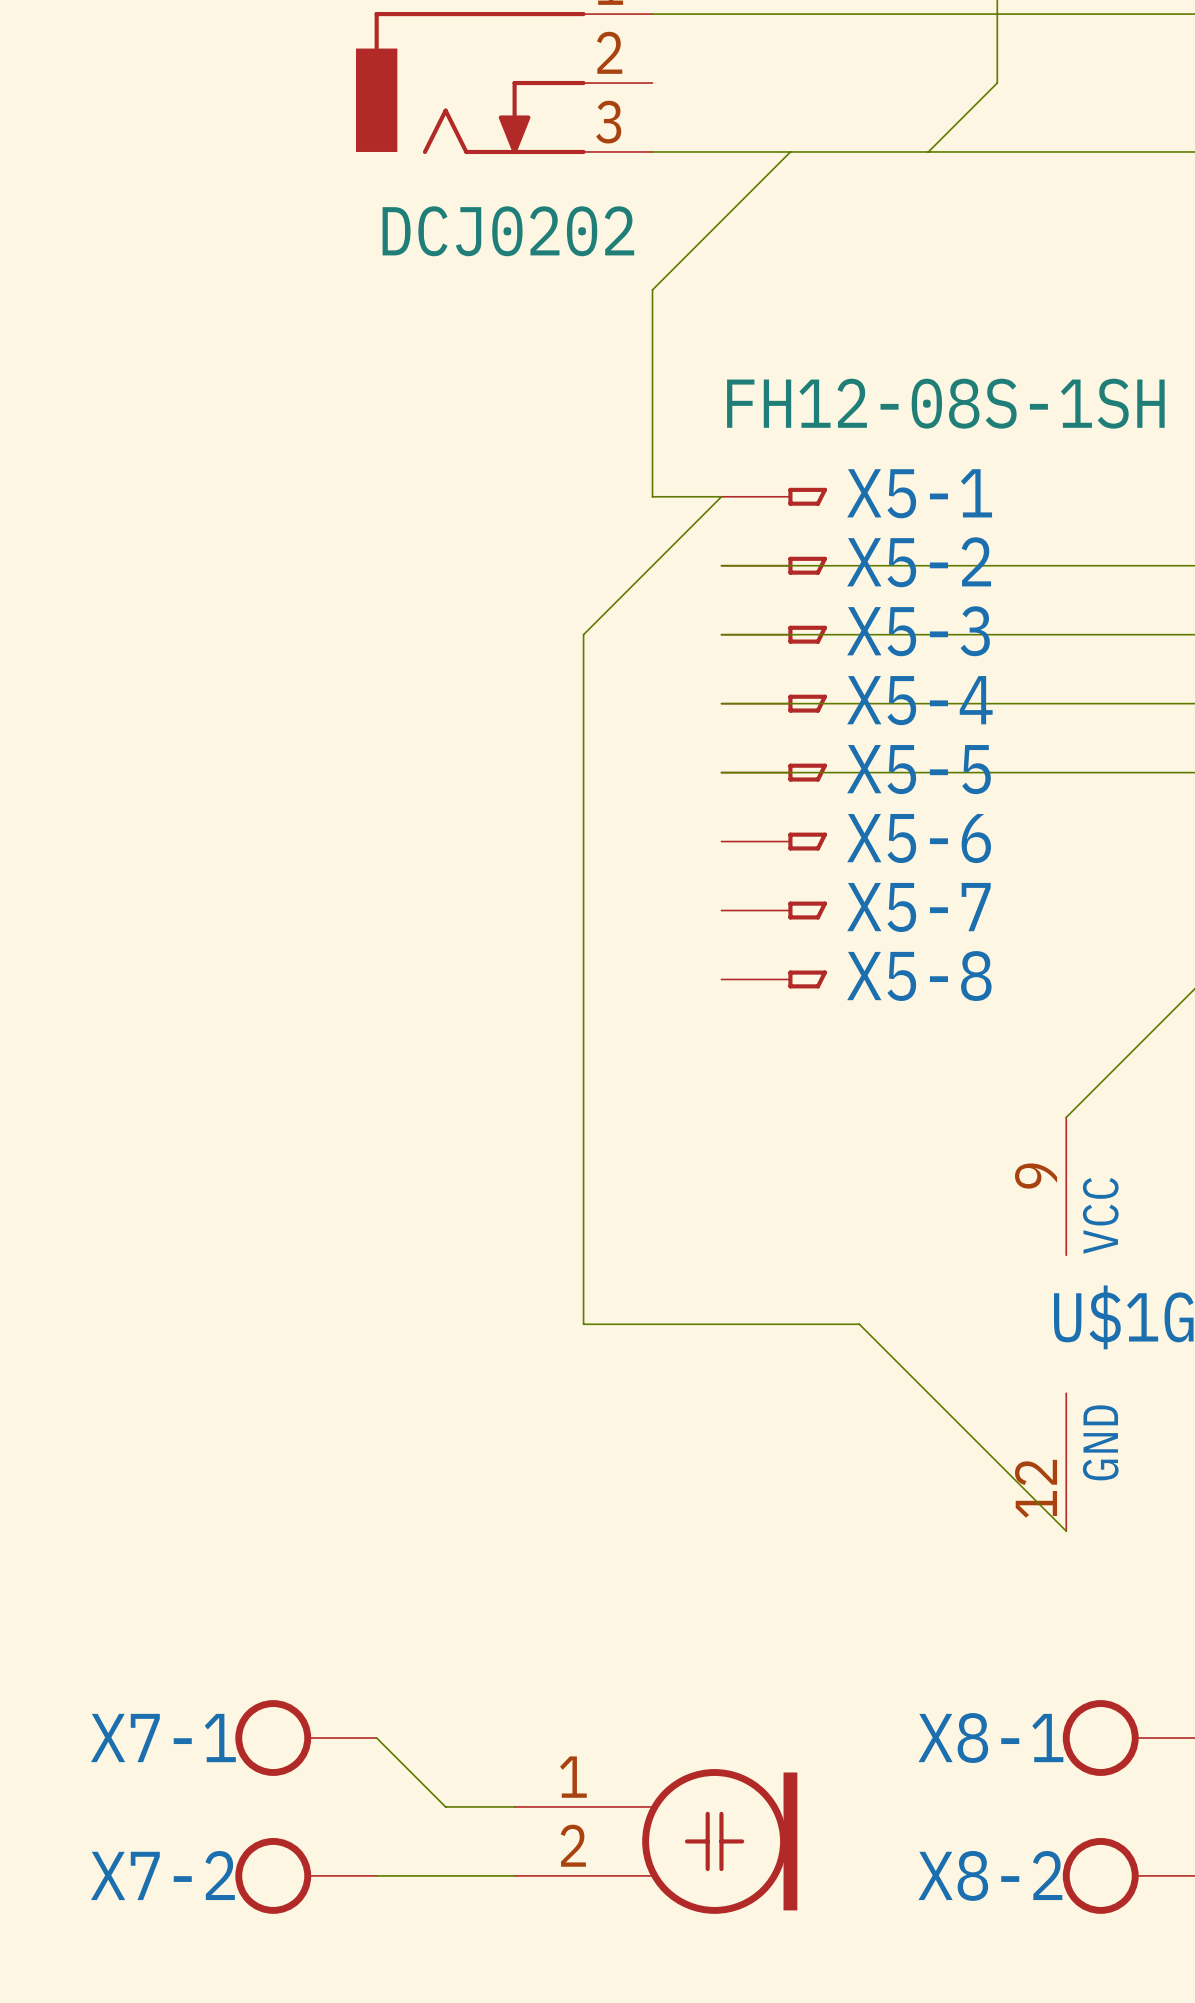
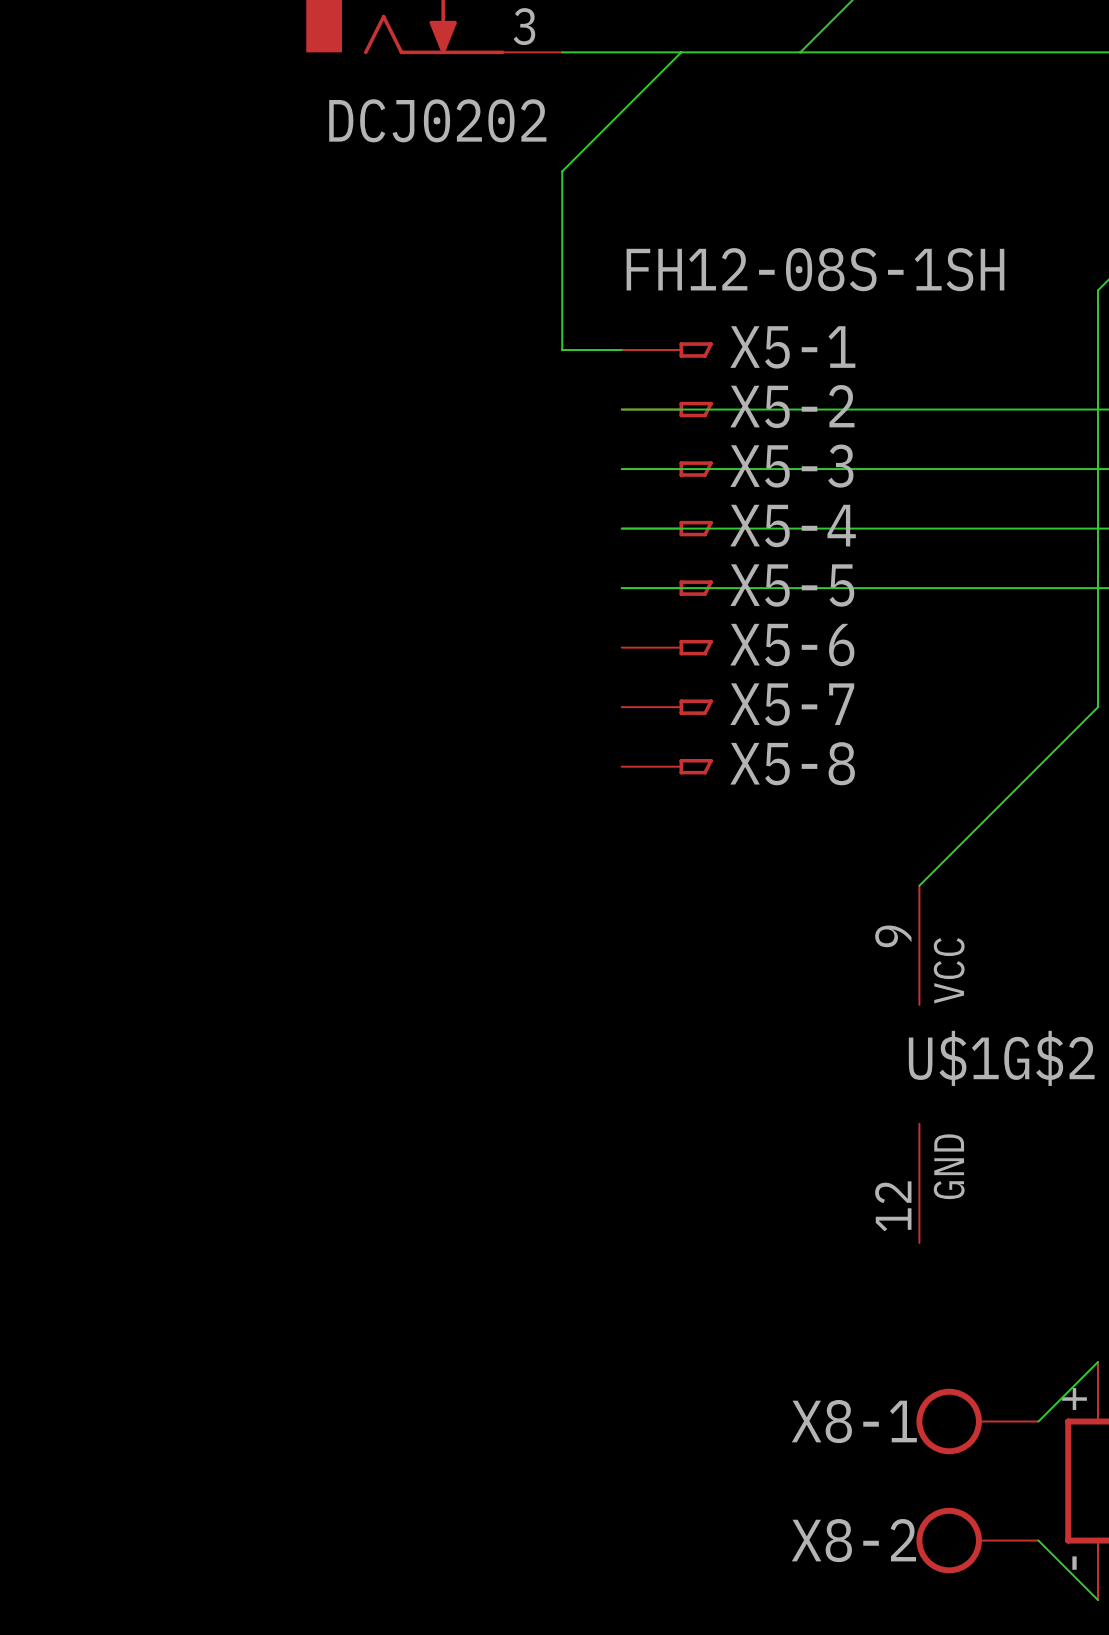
wire: (721, 496) (583, 634) (583, 1324) (859, 1324) (1066, 1531) -> none
X7-1: (306, 1738) -> none
wire: (376, 1738) (445, 1806) (514, 1806) -> none
part: (655, 1841) -> none
X7-2: (306, 1875) -> none
wire: (376, 1875) (514, 1875) -> none

